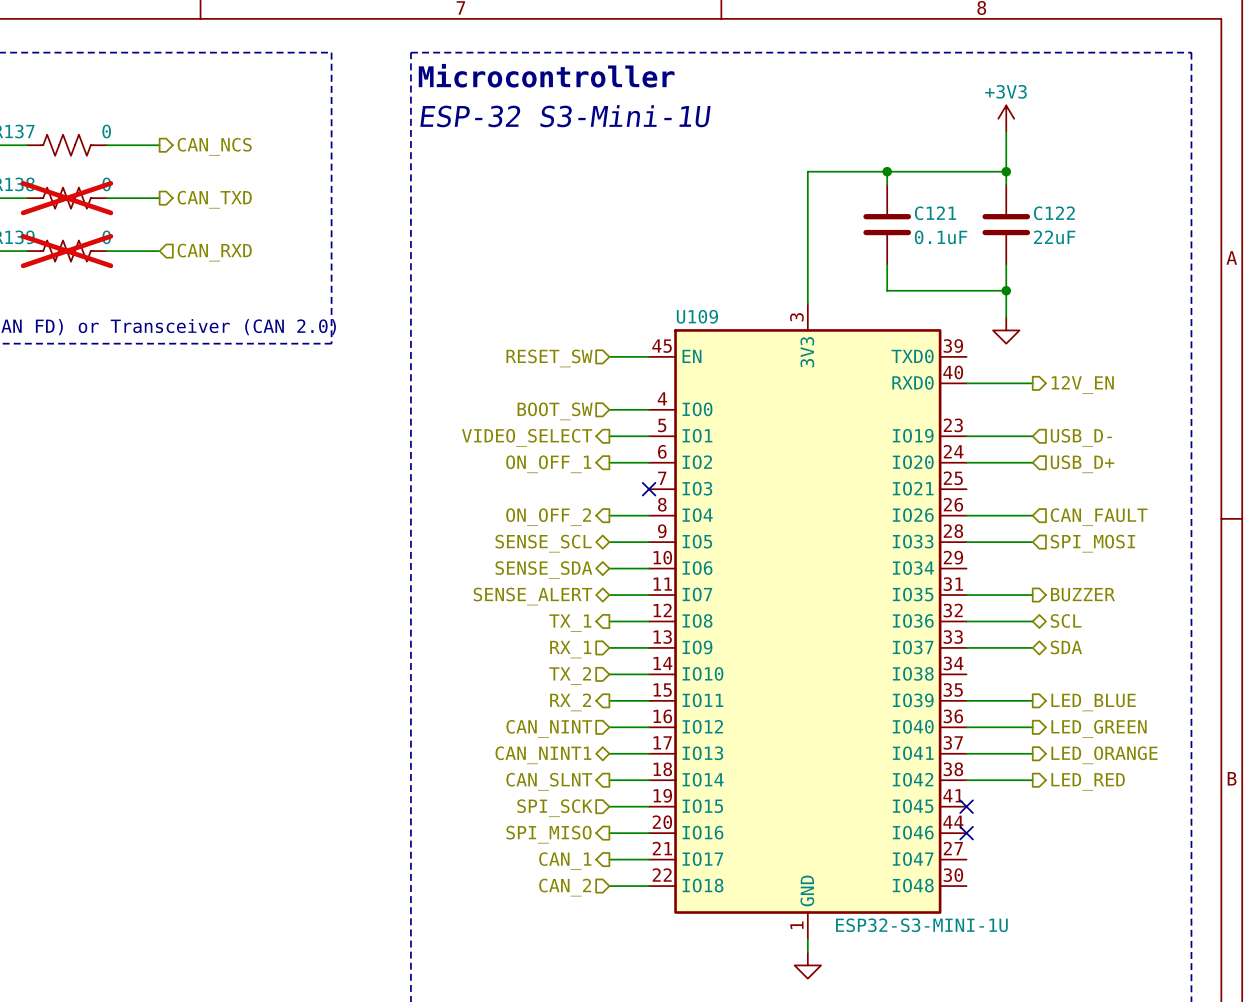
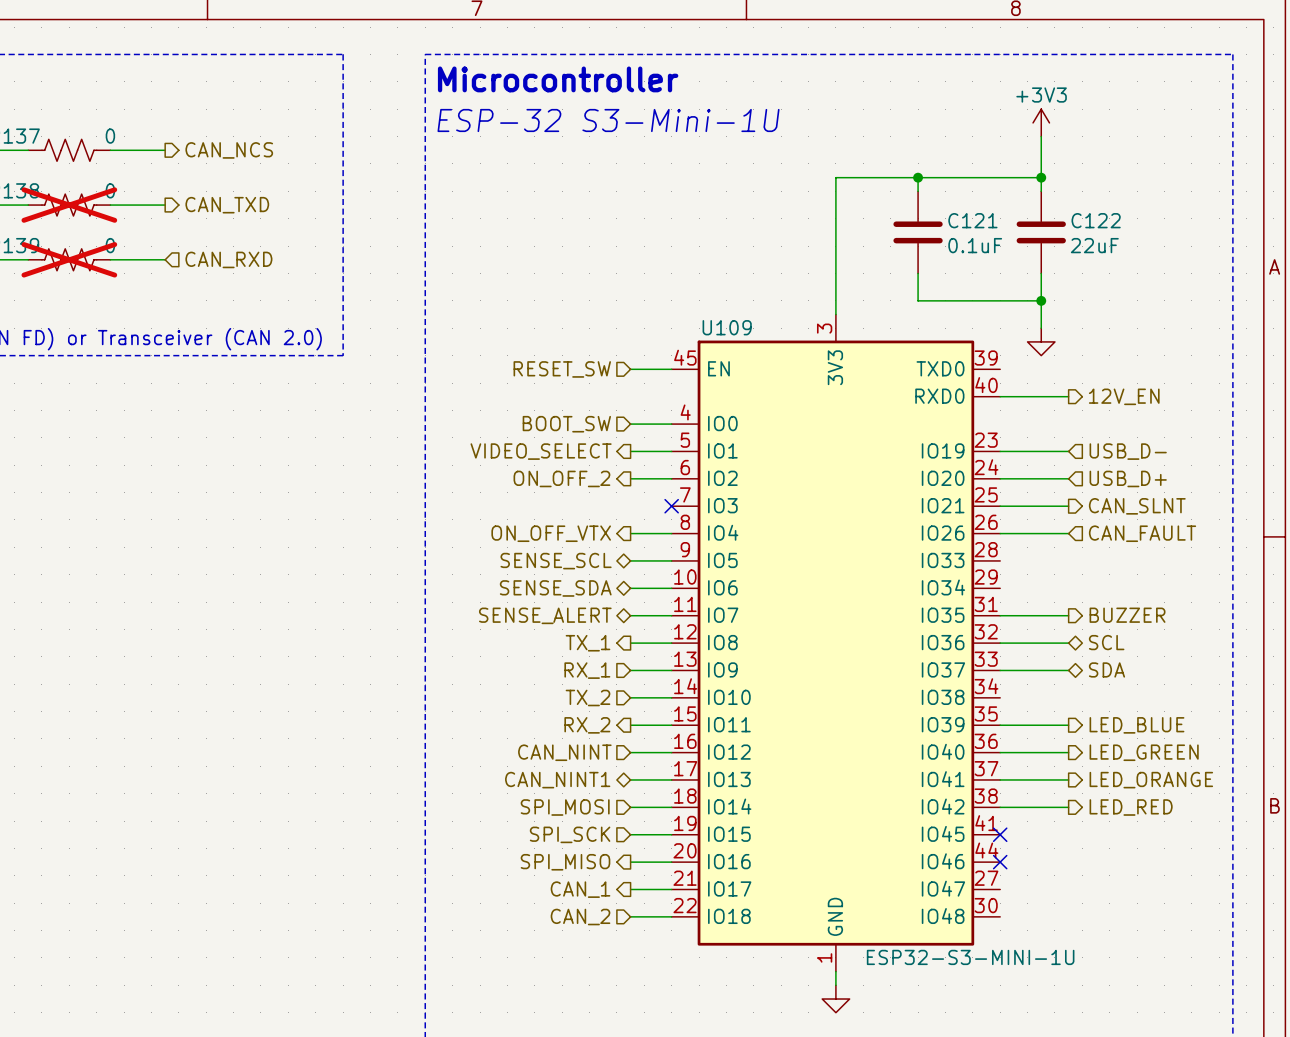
hierarchical label: ON_OFF_1 (548, 464) -> ON_OFF_2 (561, 478)
hierarchical label: none -> CAN_SLNT (1137, 506)
hierarchical label: ON_OFF_2 (548, 517) -> ON_OFF_VTX (551, 533)
wire: (966, 542) (1032, 542) -> (1000, 506) (1068, 506)
hierarchical label: SPI_MOSI (1092, 543) -> none
hierarchical label shape: output (549, 781) -> input (565, 807)
hierarchical label: CAN_SLNT (549, 781) -> SPI_MOSI (565, 807)

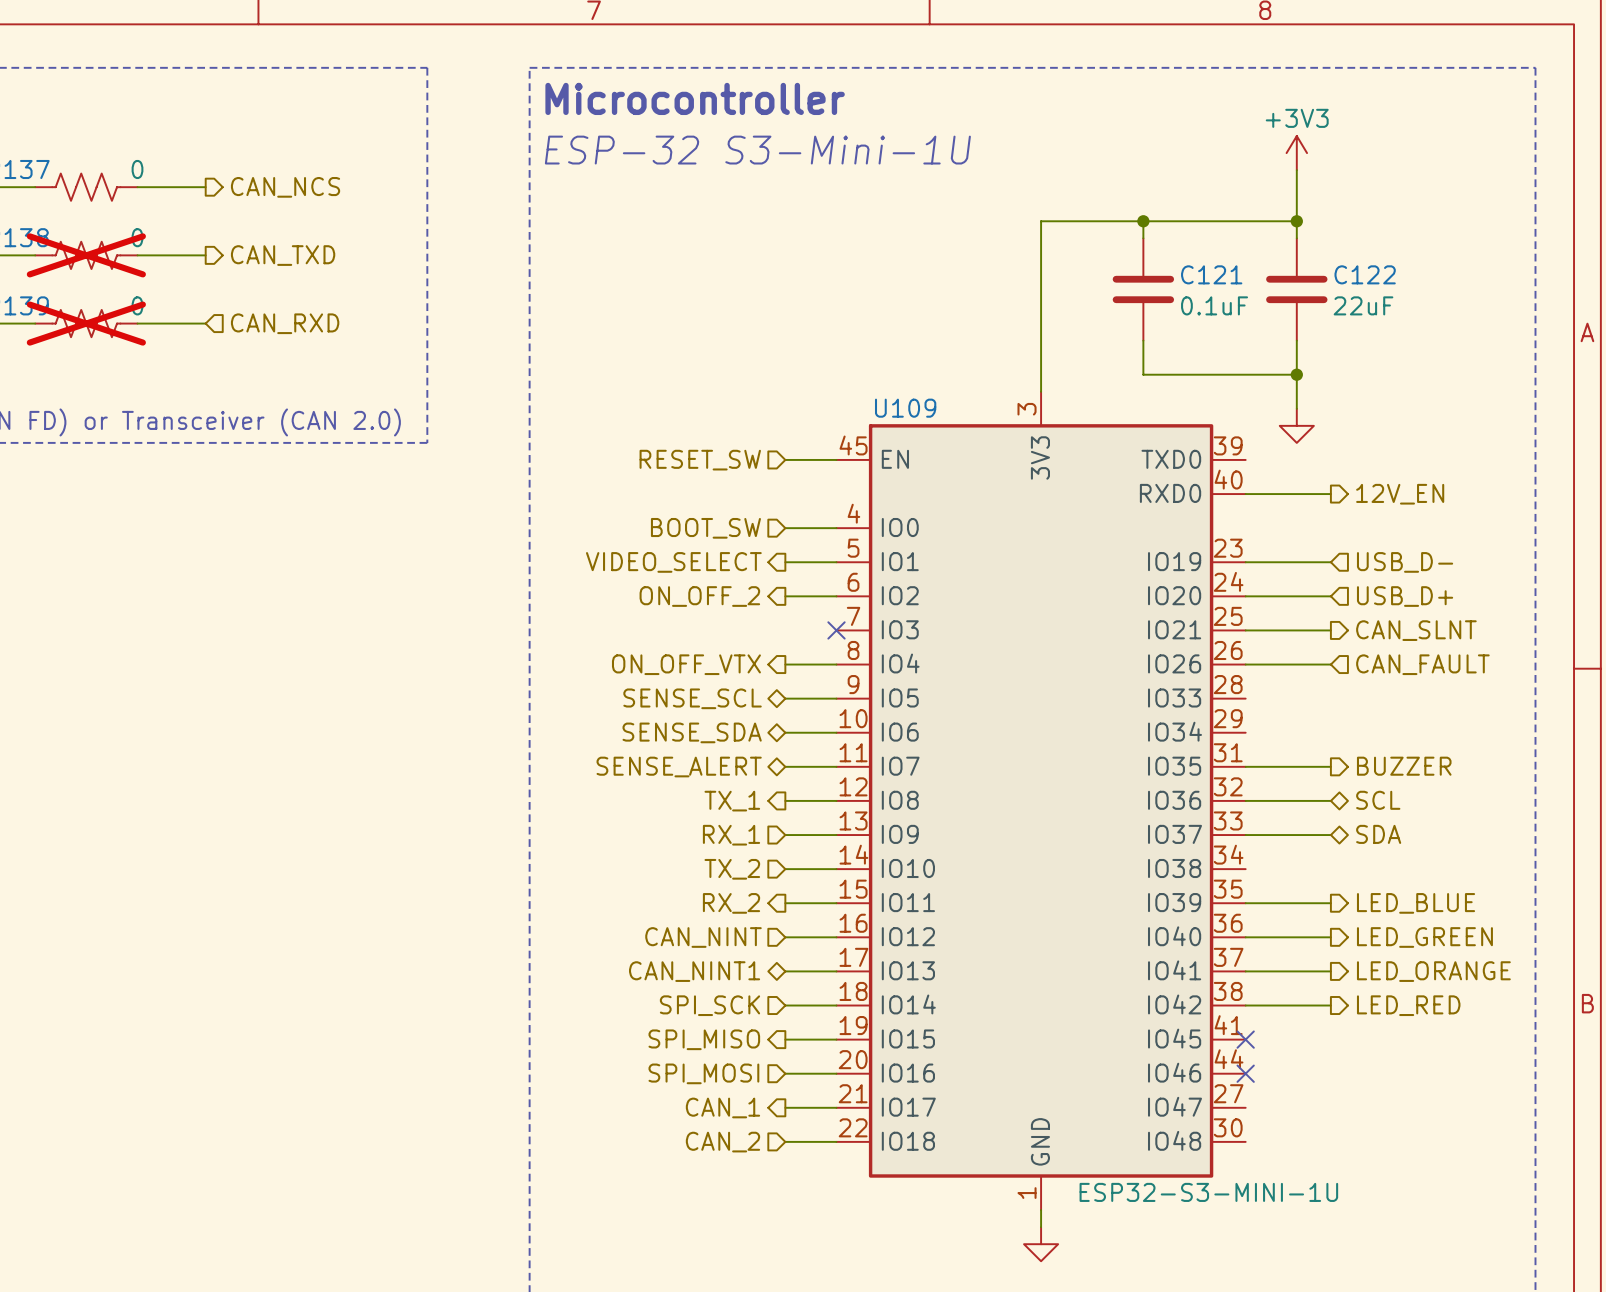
hierarchical label: SPI_MOSI (565, 807) -> SPI_SCK (709, 1005)
hierarchical label shape: input (570, 834) -> output (704, 1039)
hierarchical label: SPI_SCK (570, 834) -> SPI_MISO (704, 1039)
hierarchical label shape: output (565, 862) -> input (703, 1073)
hierarchical label: SPI_MISO (565, 862) -> SPI_MOSI (703, 1073)

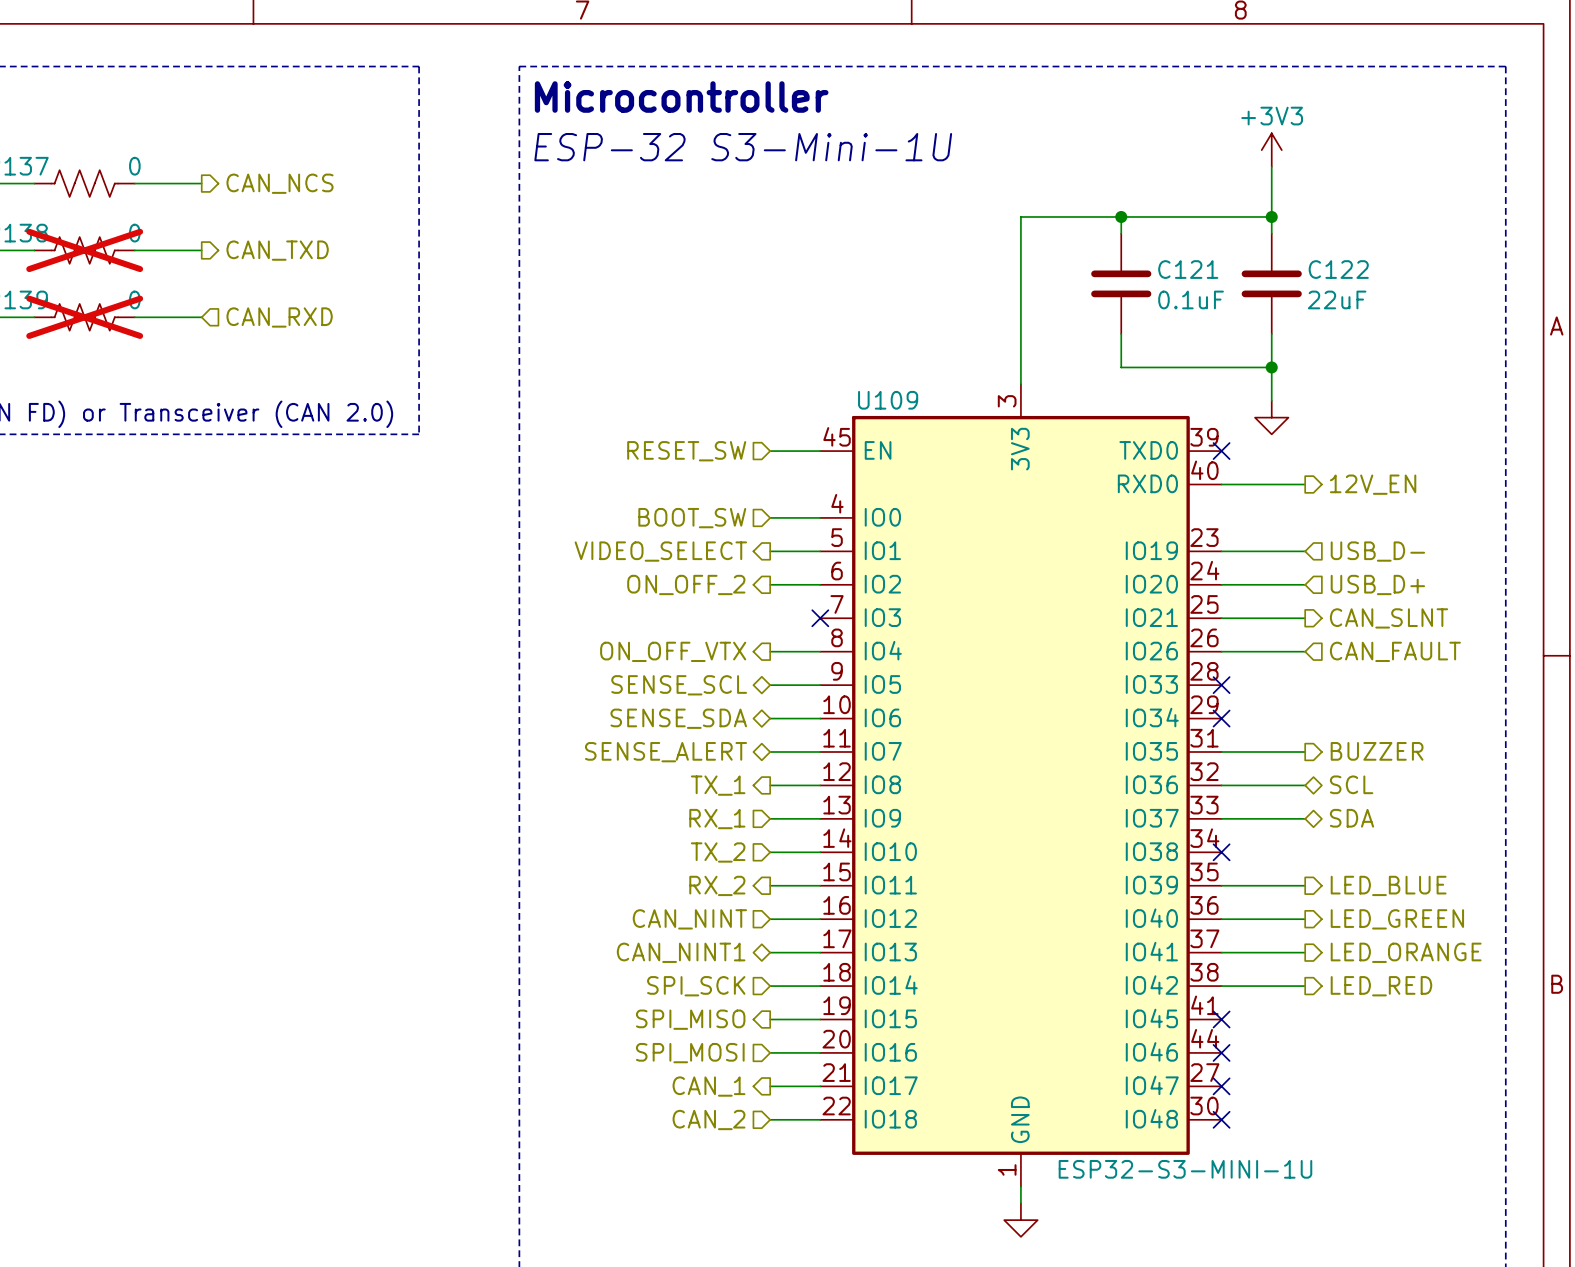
no-connect mark: none -> (1221, 451)
no-connect mark: none -> (1221, 685)
no-connect mark: none -> (1221, 718)
no-connect mark: none -> (1221, 852)
no-connect mark: none -> (1221, 1086)
no-connect mark: none -> (1221, 1119)

